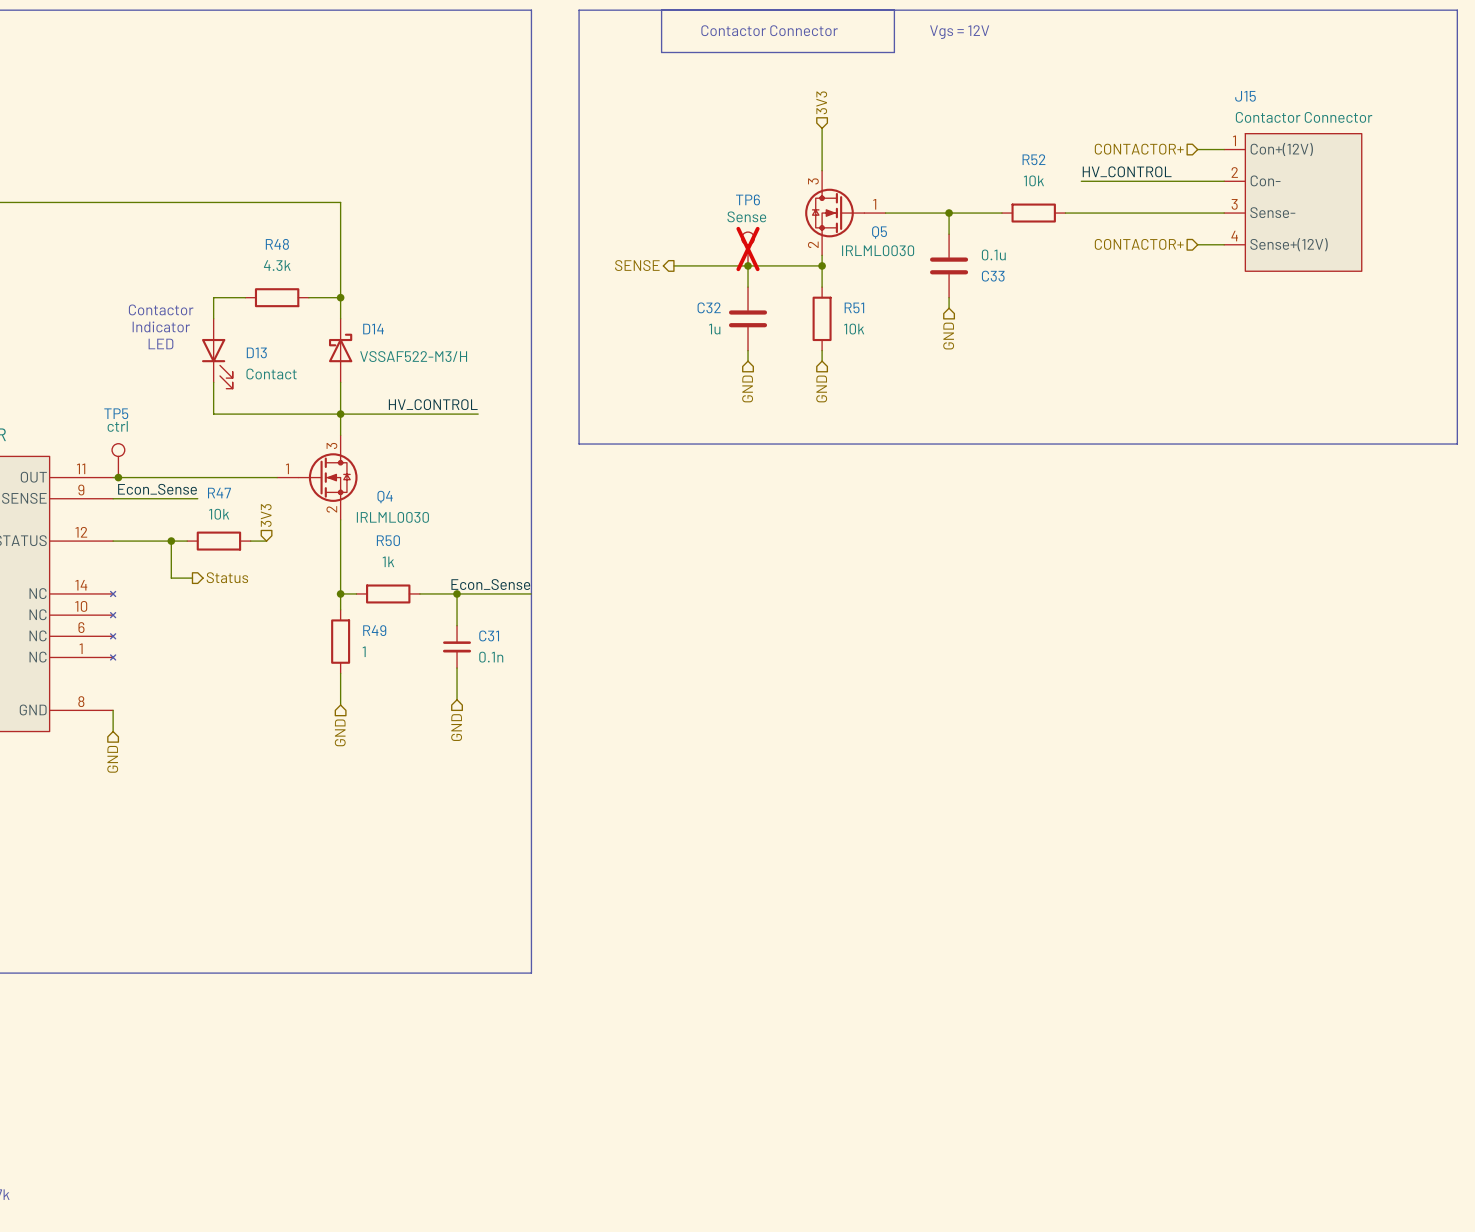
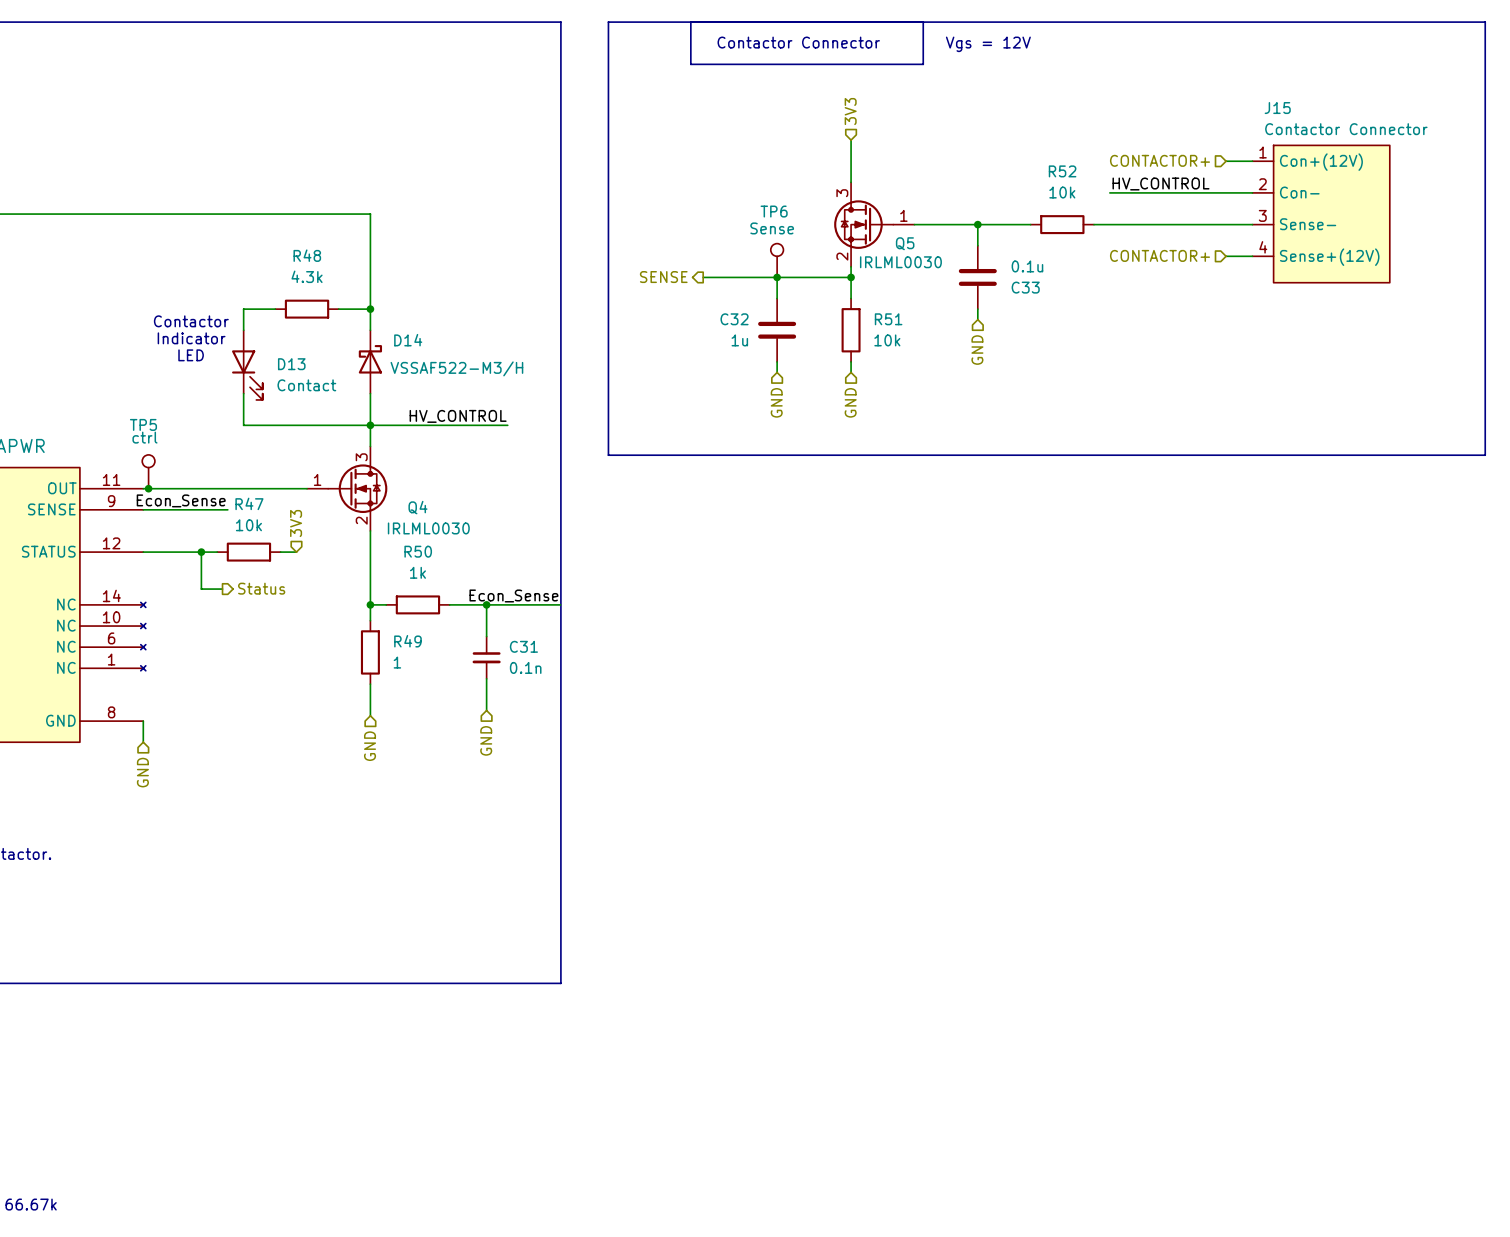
TP6 do-not-place cross: (748, 249) -> none

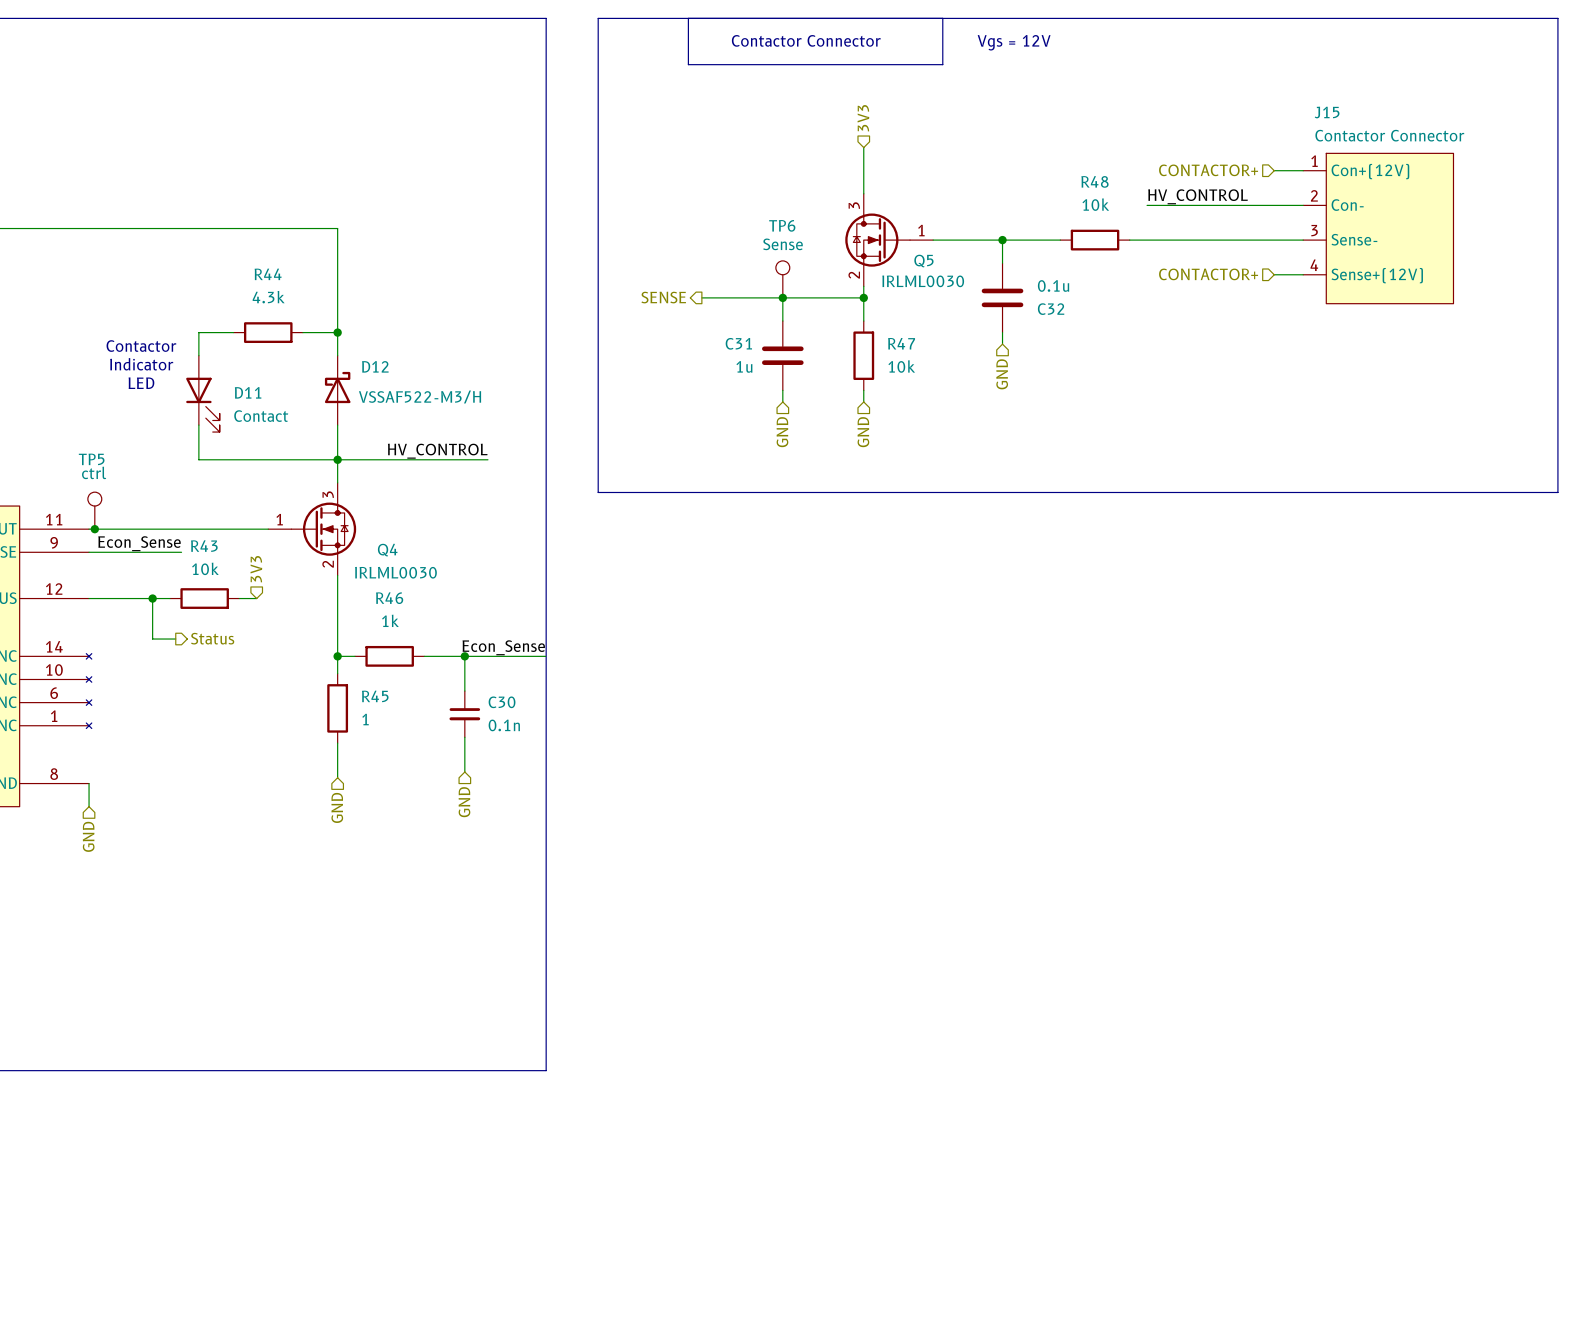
R52 name: R52 (1062, 171) -> R48 (1094, 181)
R48 name: R48 (307, 255) -> R44 (268, 274)
C33 name: C33 (1025, 287) -> C32 (1051, 309)
C32 name: C32 (734, 319) -> C31 (738, 343)
R51 name: R51 (888, 319) -> R47 (901, 343)
D14 name: D14 (408, 340) -> D12 (375, 366)
D13 name: D13 (291, 364) -> D11 (248, 392)
R47 name: R47 (249, 503) -> R43 (204, 546)
R50 name: R50 (418, 551) -> R46 (389, 598)
R49 name: R49 (407, 641) -> R45 (375, 696)
C31 name: C31 (523, 646) -> C30 (502, 702)

